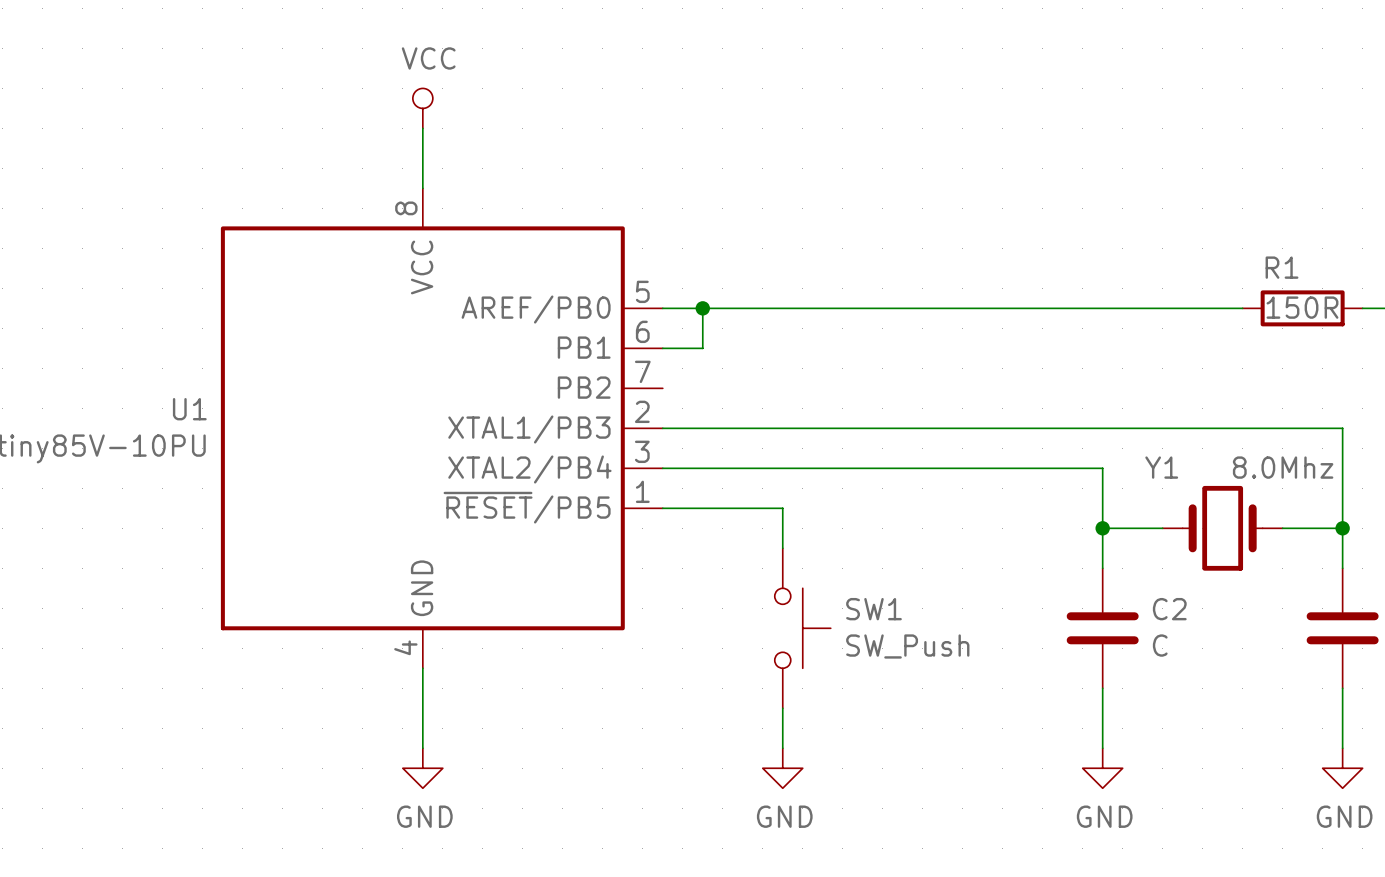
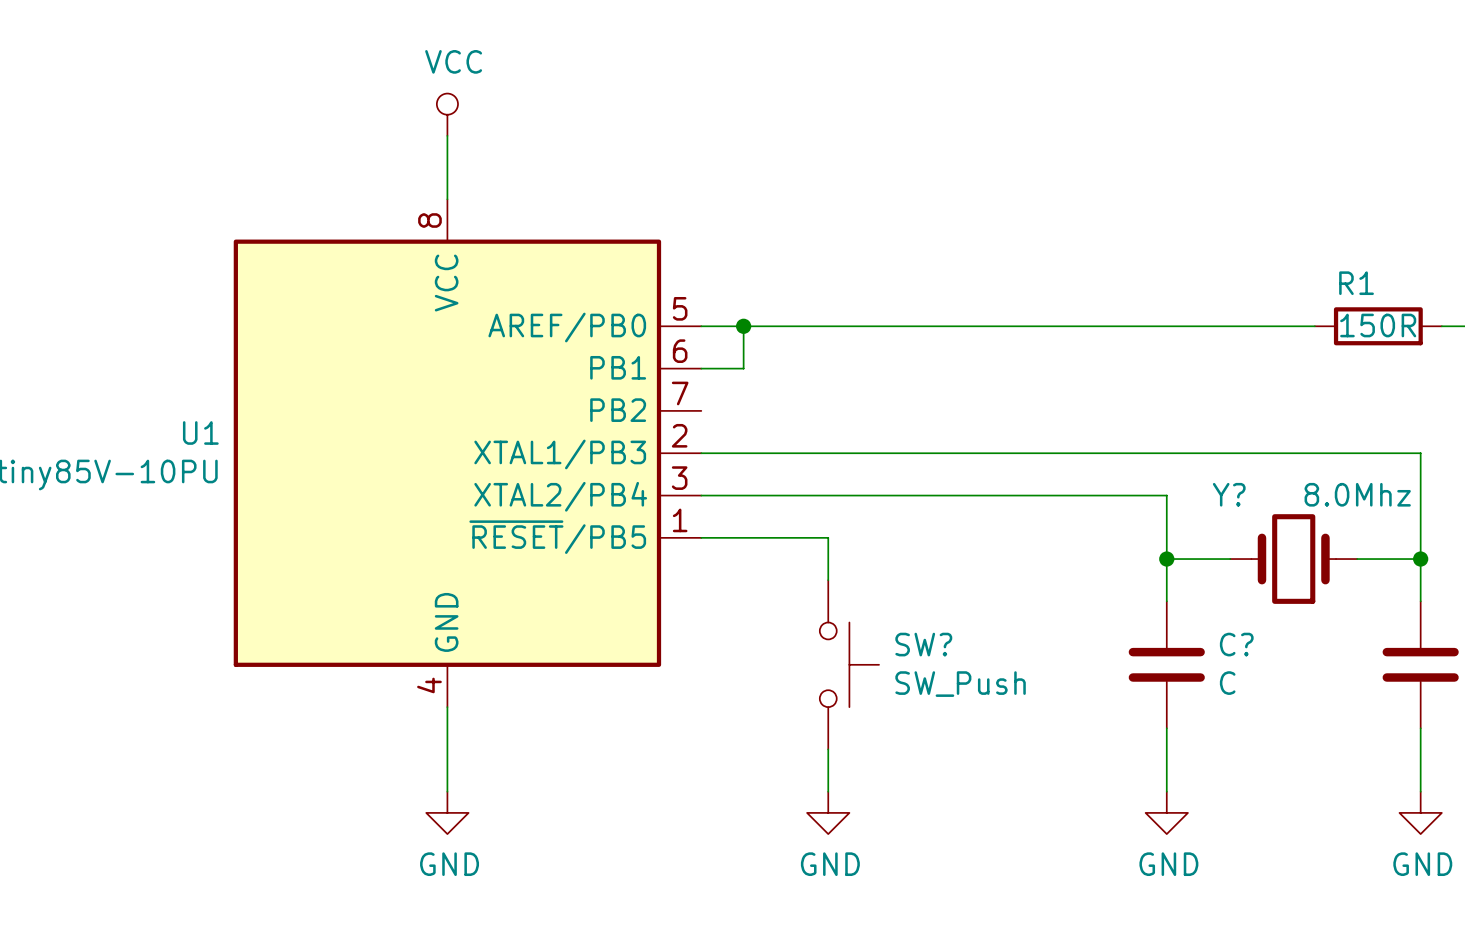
Y1 name: Y1 (1161, 467) -> Y? (1229, 494)
SW1 name: SW1 (873, 609) -> SW? (923, 644)
C2 name: C2 (1169, 609) -> C? (1236, 644)

